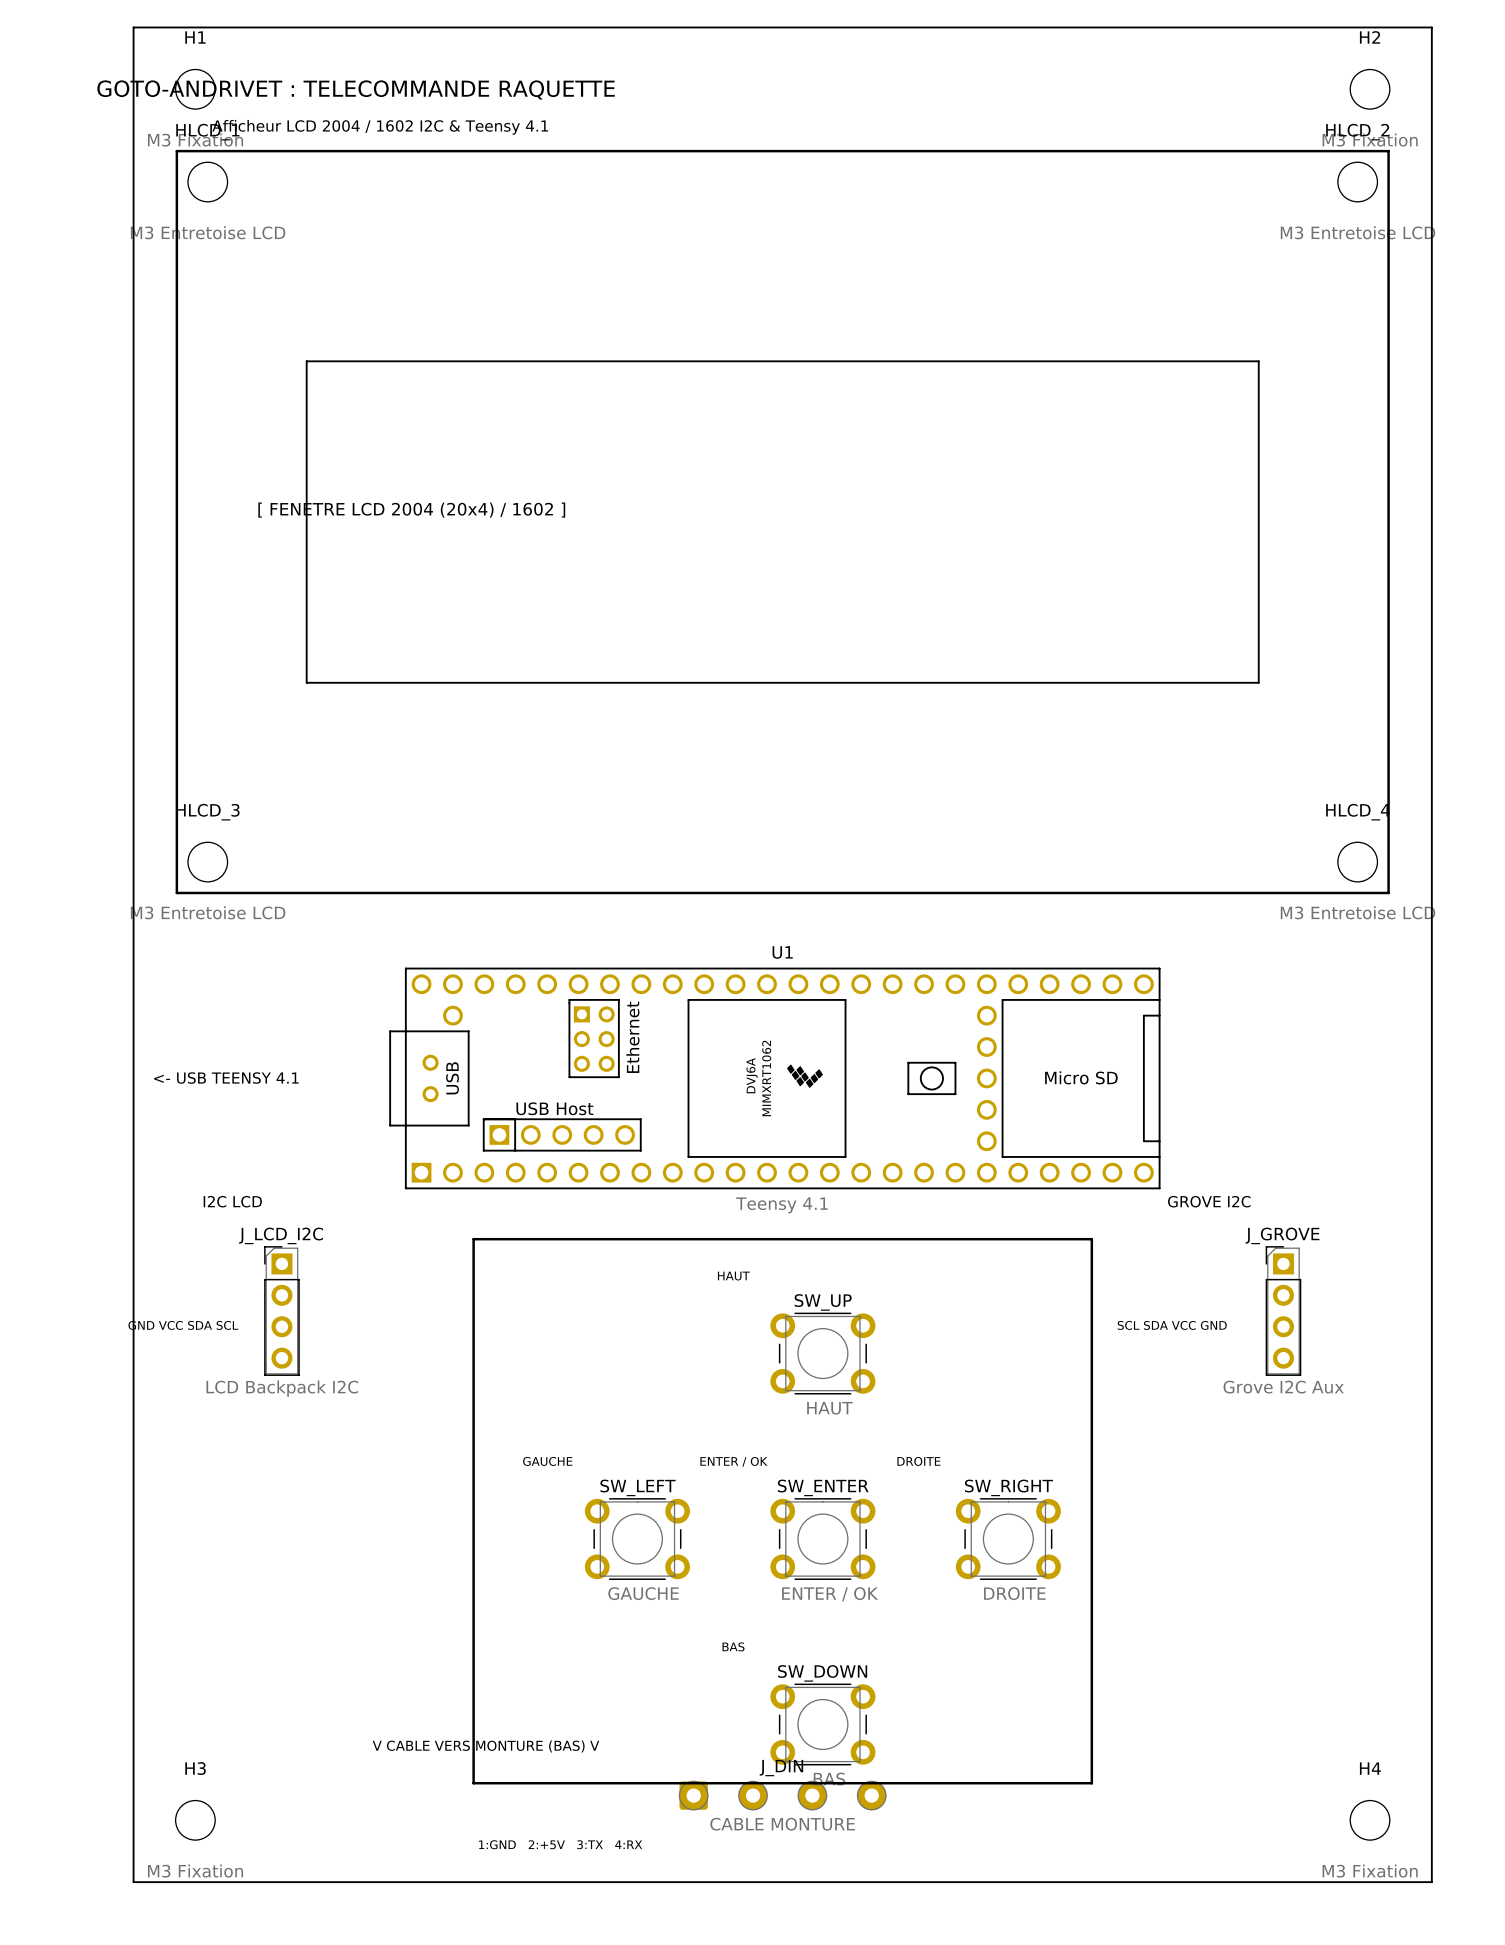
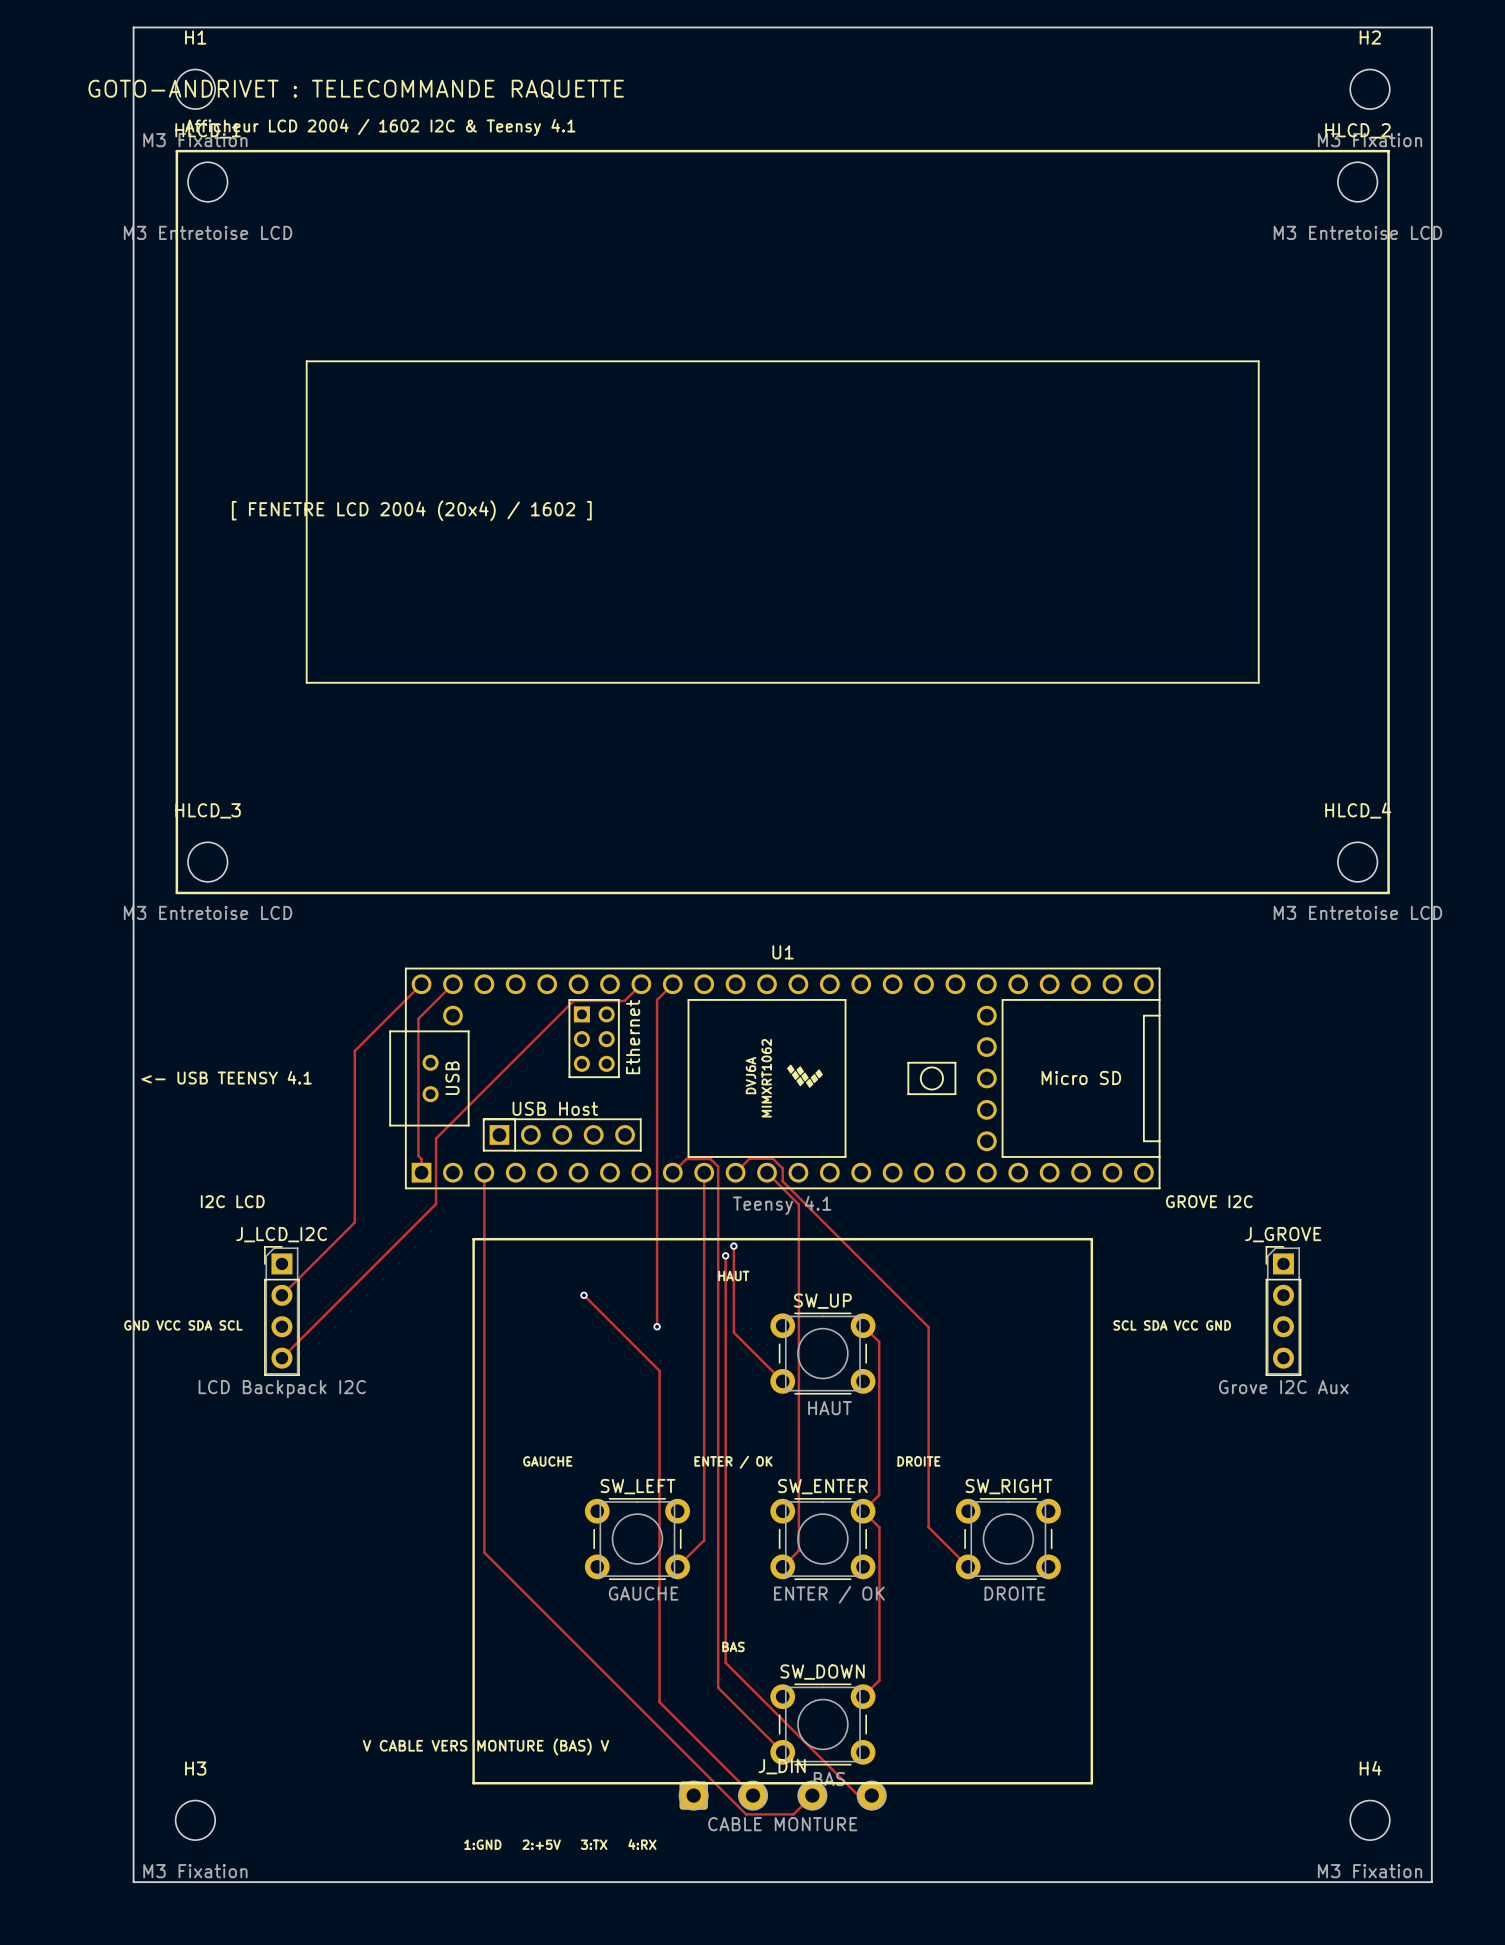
track: none -> (421, 984) (354, 1051) (354, 1222) (281, 1295)
track: none -> (452, 984) (418, 1018) (418, 1155) (421, 1159) (421, 1172)
track: none -> (641, 984) (624, 1000) (573, 1000) (436, 1138) (436, 1204) (281, 1358)
track: none -> (672, 984) (657, 999) (657, 1326)
track: none -> (484, 1172) (484, 1552) (746, 1814) (793, 1814) (812, 1795)
track: none -> (672, 1172) (686, 1159) (710, 1159) (718, 1166) (718, 1687) (782, 1752)
track: none -> (704, 1172) (704, 1540) (677, 1566)
track: none -> (735, 1172) (749, 1158) (772, 1158) (782, 1168) (782, 1181) (928, 1327) (928, 1527) (968, 1566)
track: none -> (767, 1172) (798, 1204) (798, 1550) (782, 1566)
track: none -> (733, 1246) (733, 1332) (782, 1381)
via: none -> (733, 1246)
track: none -> (725, 1255) (725, 1662) (858, 1795) (871, 1795)
via: none -> (725, 1255)
track: none -> (584, 1295) (659, 1370) (659, 1702) (753, 1795)
via: none -> (584, 1295)
track: none -> (863, 1325) (879, 1341) (879, 1495) (863, 1511) (879, 1527) (879, 1680) (863, 1696)
via: none -> (657, 1326)

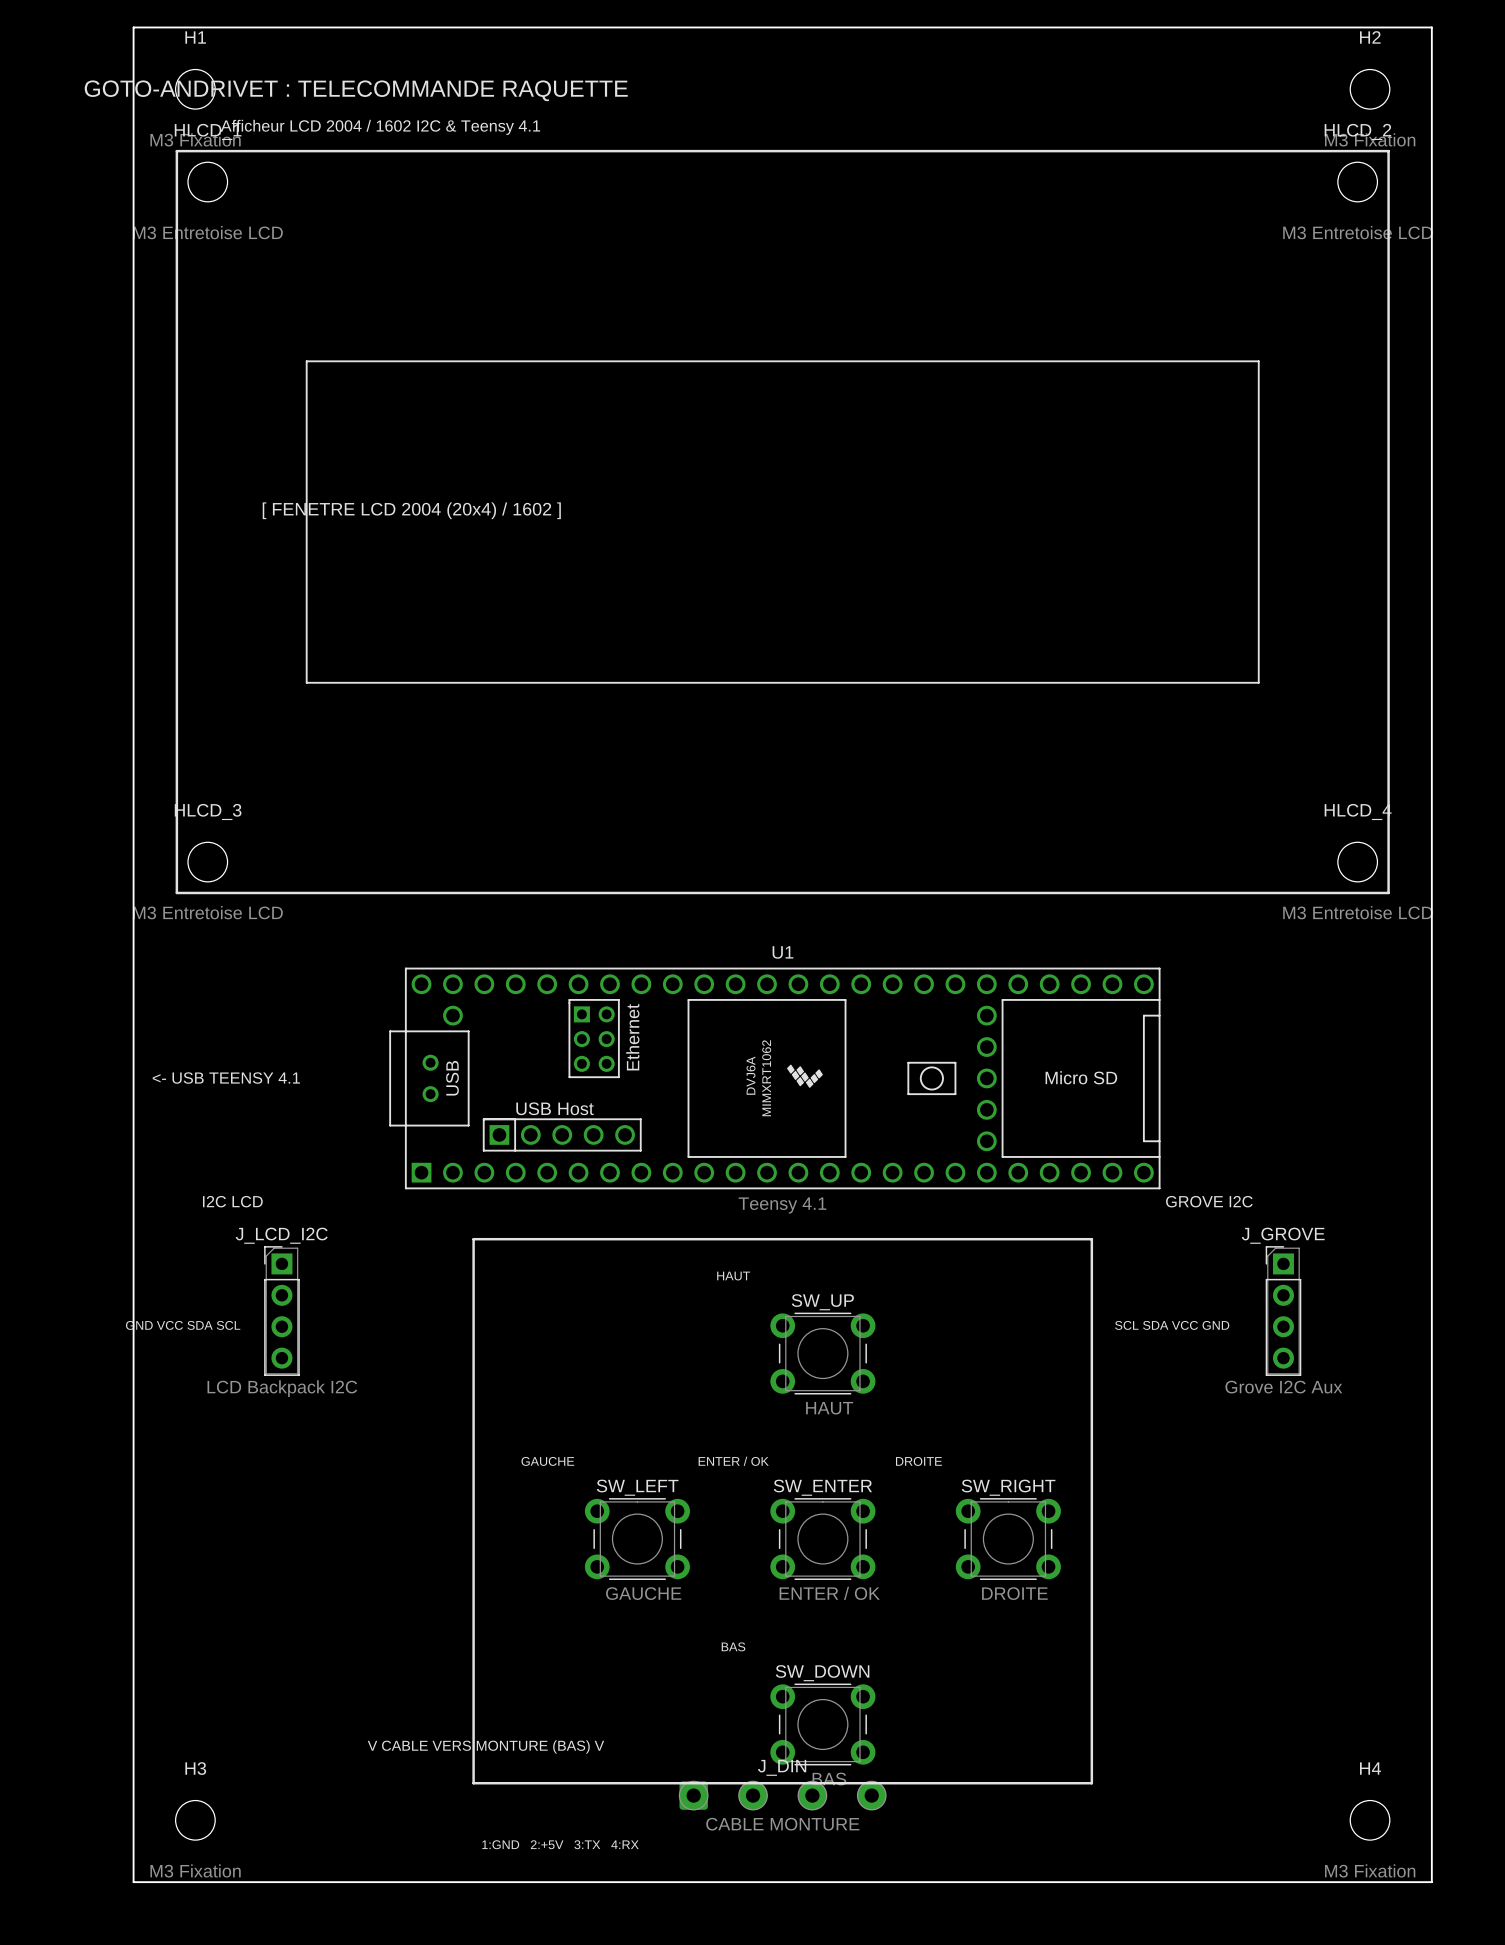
track: (421, 984) (354, 1051) (354, 1222) (281, 1295) -> none
track: (452, 984) (418, 1018) (418, 1155) (421, 1159) (421, 1172) -> none
track: (641, 984) (624, 1000) (573, 1000) (436, 1138) (436, 1204) (281, 1358) -> none
track: (672, 984) (657, 999) (657, 1326) -> none
track: (484, 1172) (484, 1552) (746, 1814) (793, 1814) (812, 1795) -> none
track: (672, 1172) (686, 1159) (710, 1159) (718, 1166) (718, 1687) (782, 1752) -> none
track: (704, 1172) (704, 1540) (677, 1566) -> none
track: (735, 1172) (749, 1158) (772, 1158) (782, 1168) (782, 1181) (928, 1327) (928, 1527) (968, 1566) -> none
track: (767, 1172) (798, 1204) (798, 1550) (782, 1566) -> none
track: (733, 1246) (733, 1332) (782, 1381) -> none
via: (733, 1246) -> none
track: (725, 1255) (725, 1662) (858, 1795) (871, 1795) -> none
via: (725, 1255) -> none
track: (584, 1295) (659, 1370) (659, 1702) (753, 1795) -> none
via: (584, 1295) -> none
track: (863, 1325) (879, 1341) (879, 1495) (863, 1511) (879, 1527) (879, 1680) (863, 1696) -> none
via: (657, 1326) -> none

